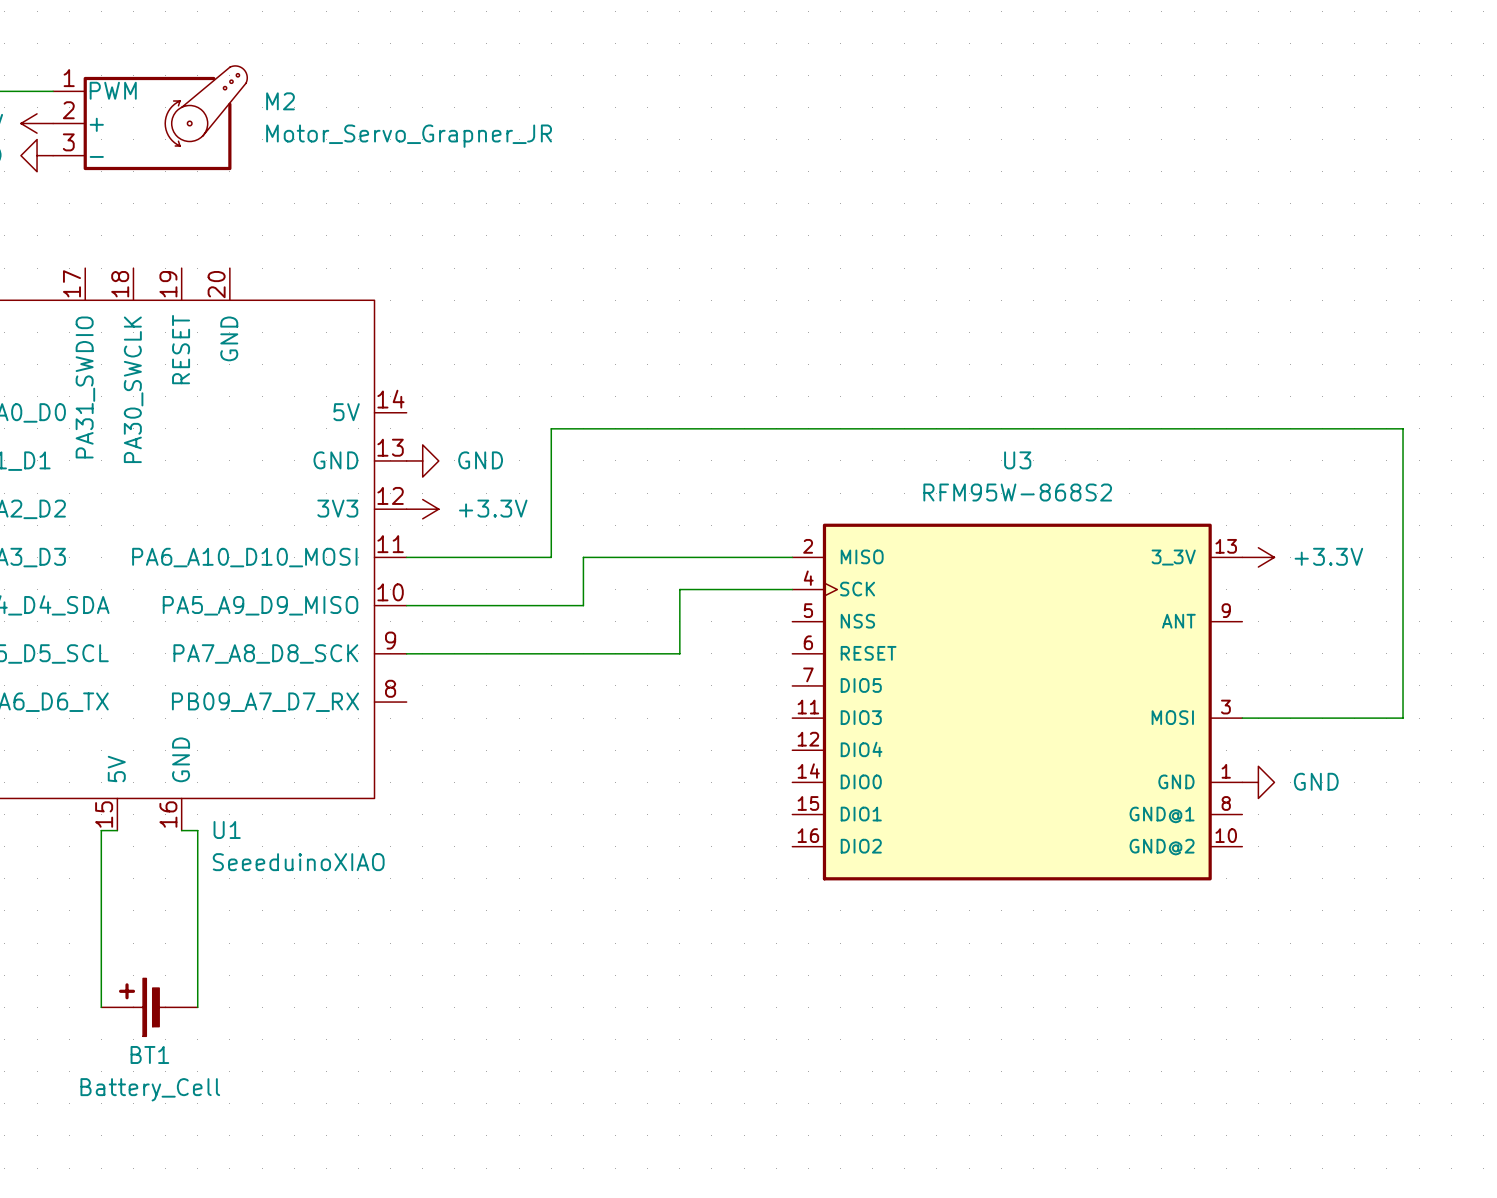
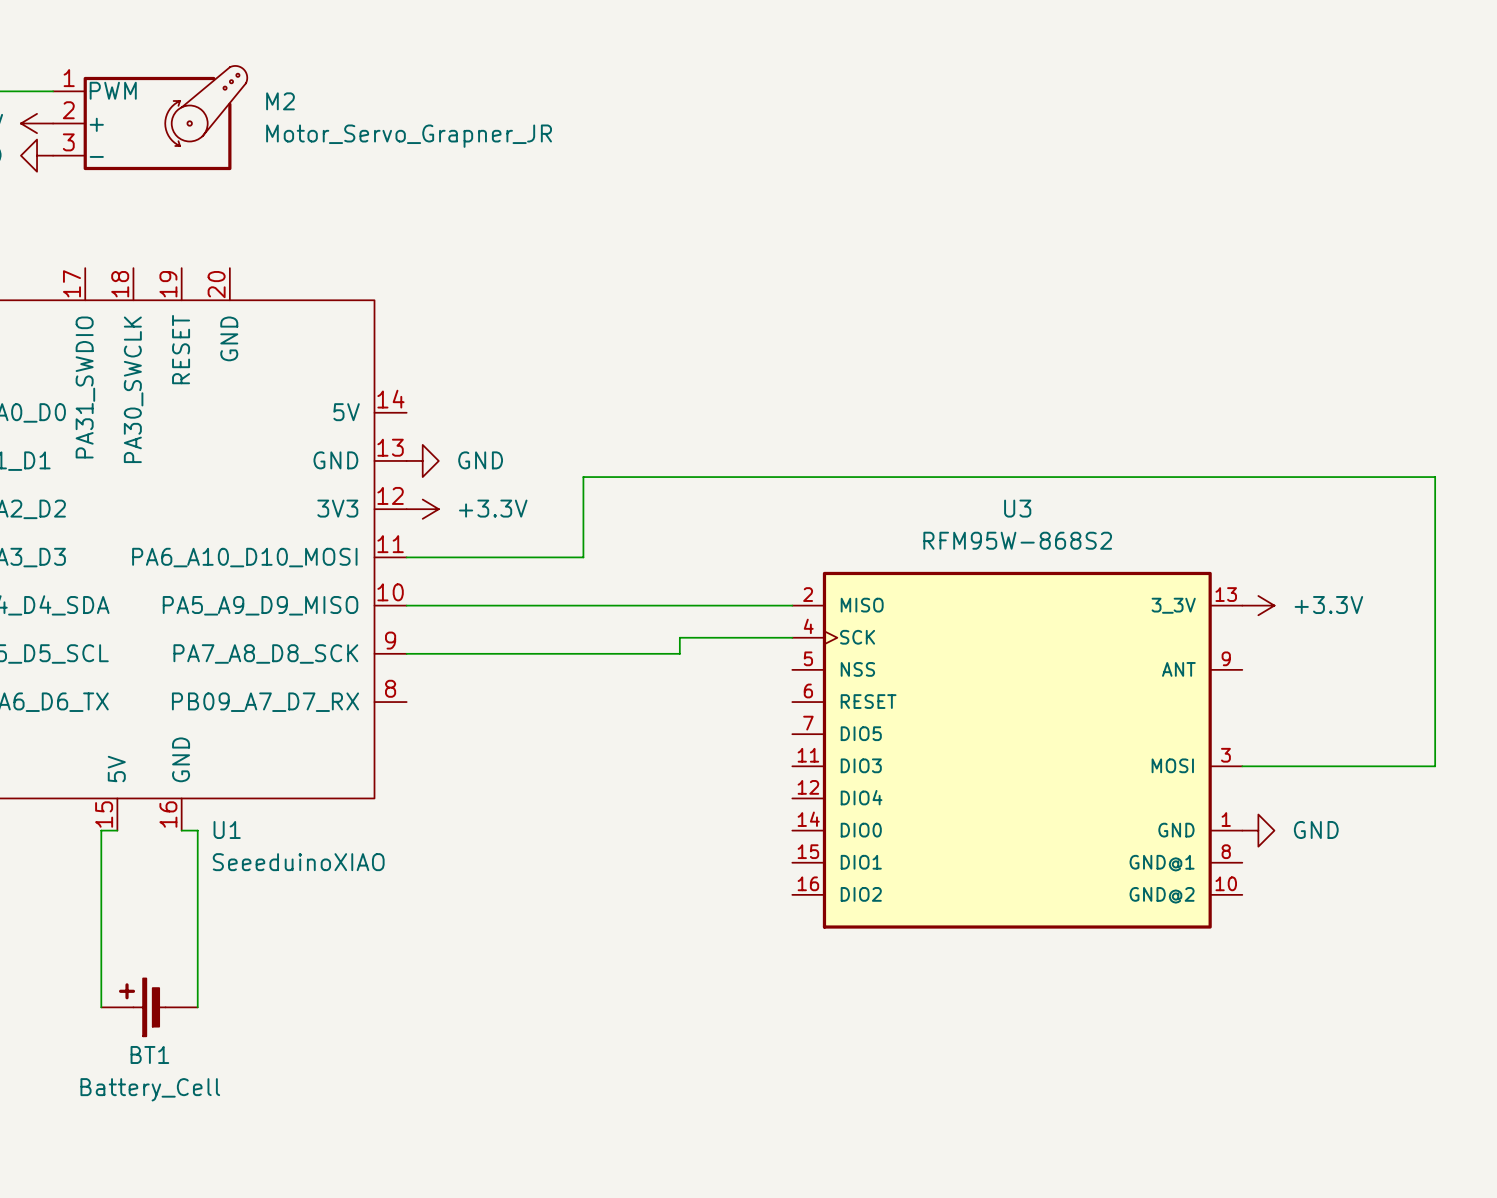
wire: (551, 557) (551, 428) (1403, 428) (1403, 718) (1242, 718) -> (551, 557) (583, 557) (583, 477) (1435, 477) (1435, 766) (1242, 766)
wire: (792, 557) (583, 557) (583, 605) -> (792, 605) (583, 605)
power symbol position: +3.3V (1258, 557) -> +3.3V (1258, 605)
wire: (792, 589) (679, 589) (679, 637) -> (792, 637) (679, 637)
U3 position: (1017, 702) -> (1017, 750)
power symbol position: GND (1258, 782) -> GND (1258, 830)

